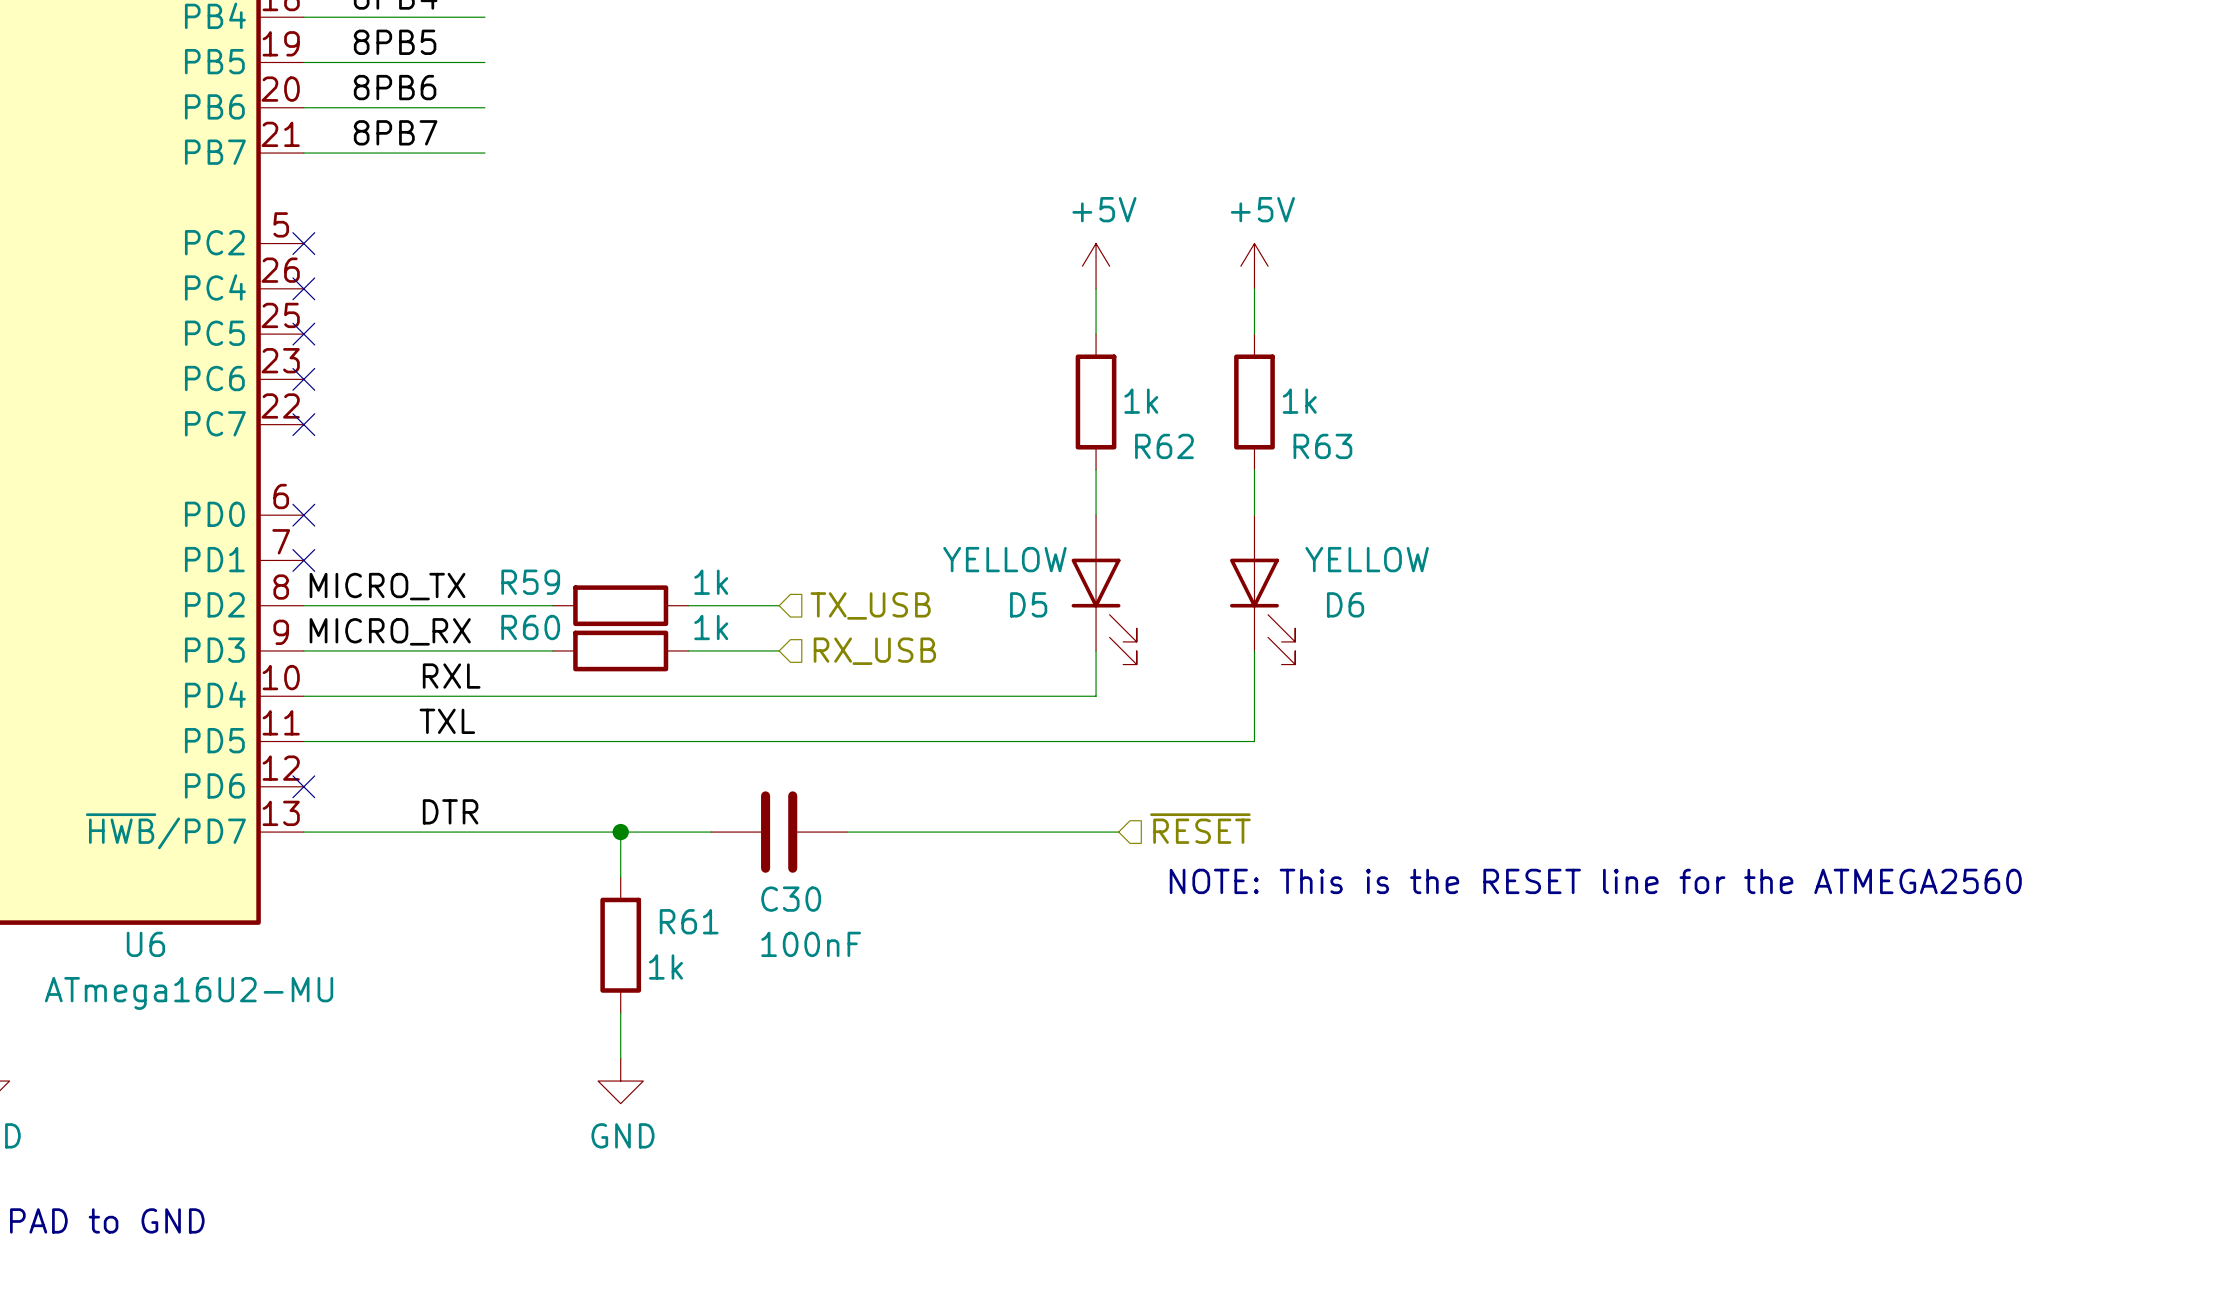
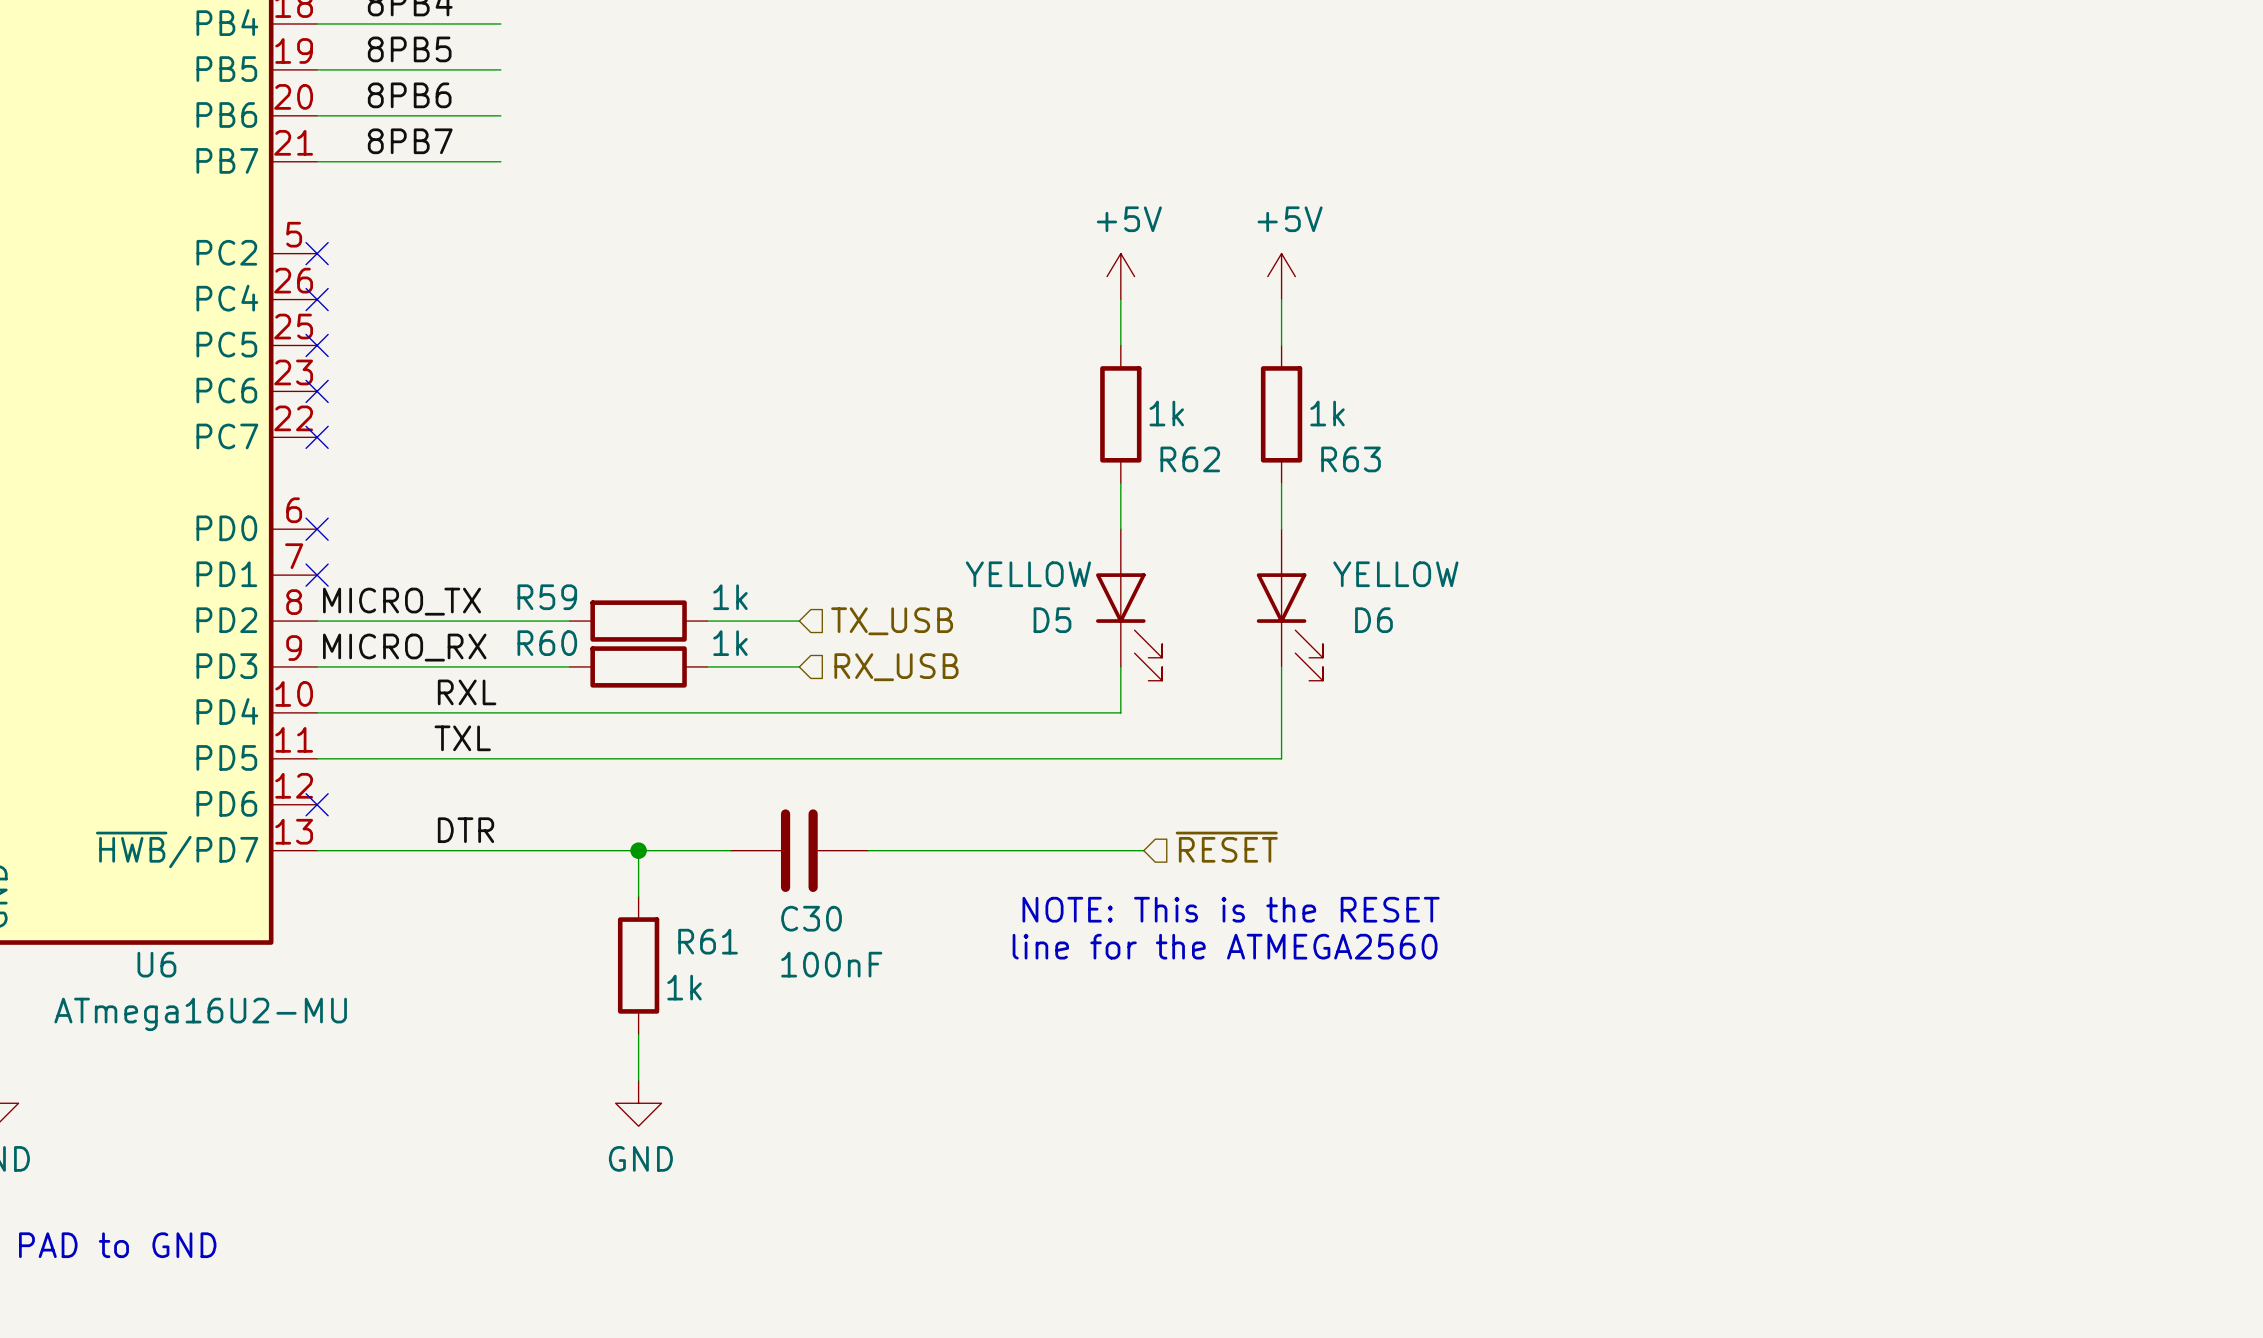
text: NOTE: This is the RESET line for the ATMEGA2560 (1595, 881) -> none
text: none -> NOTE: This is the RESET (1231, 909)
text: none -> line for the ATMEGA2560 (1225, 946)

